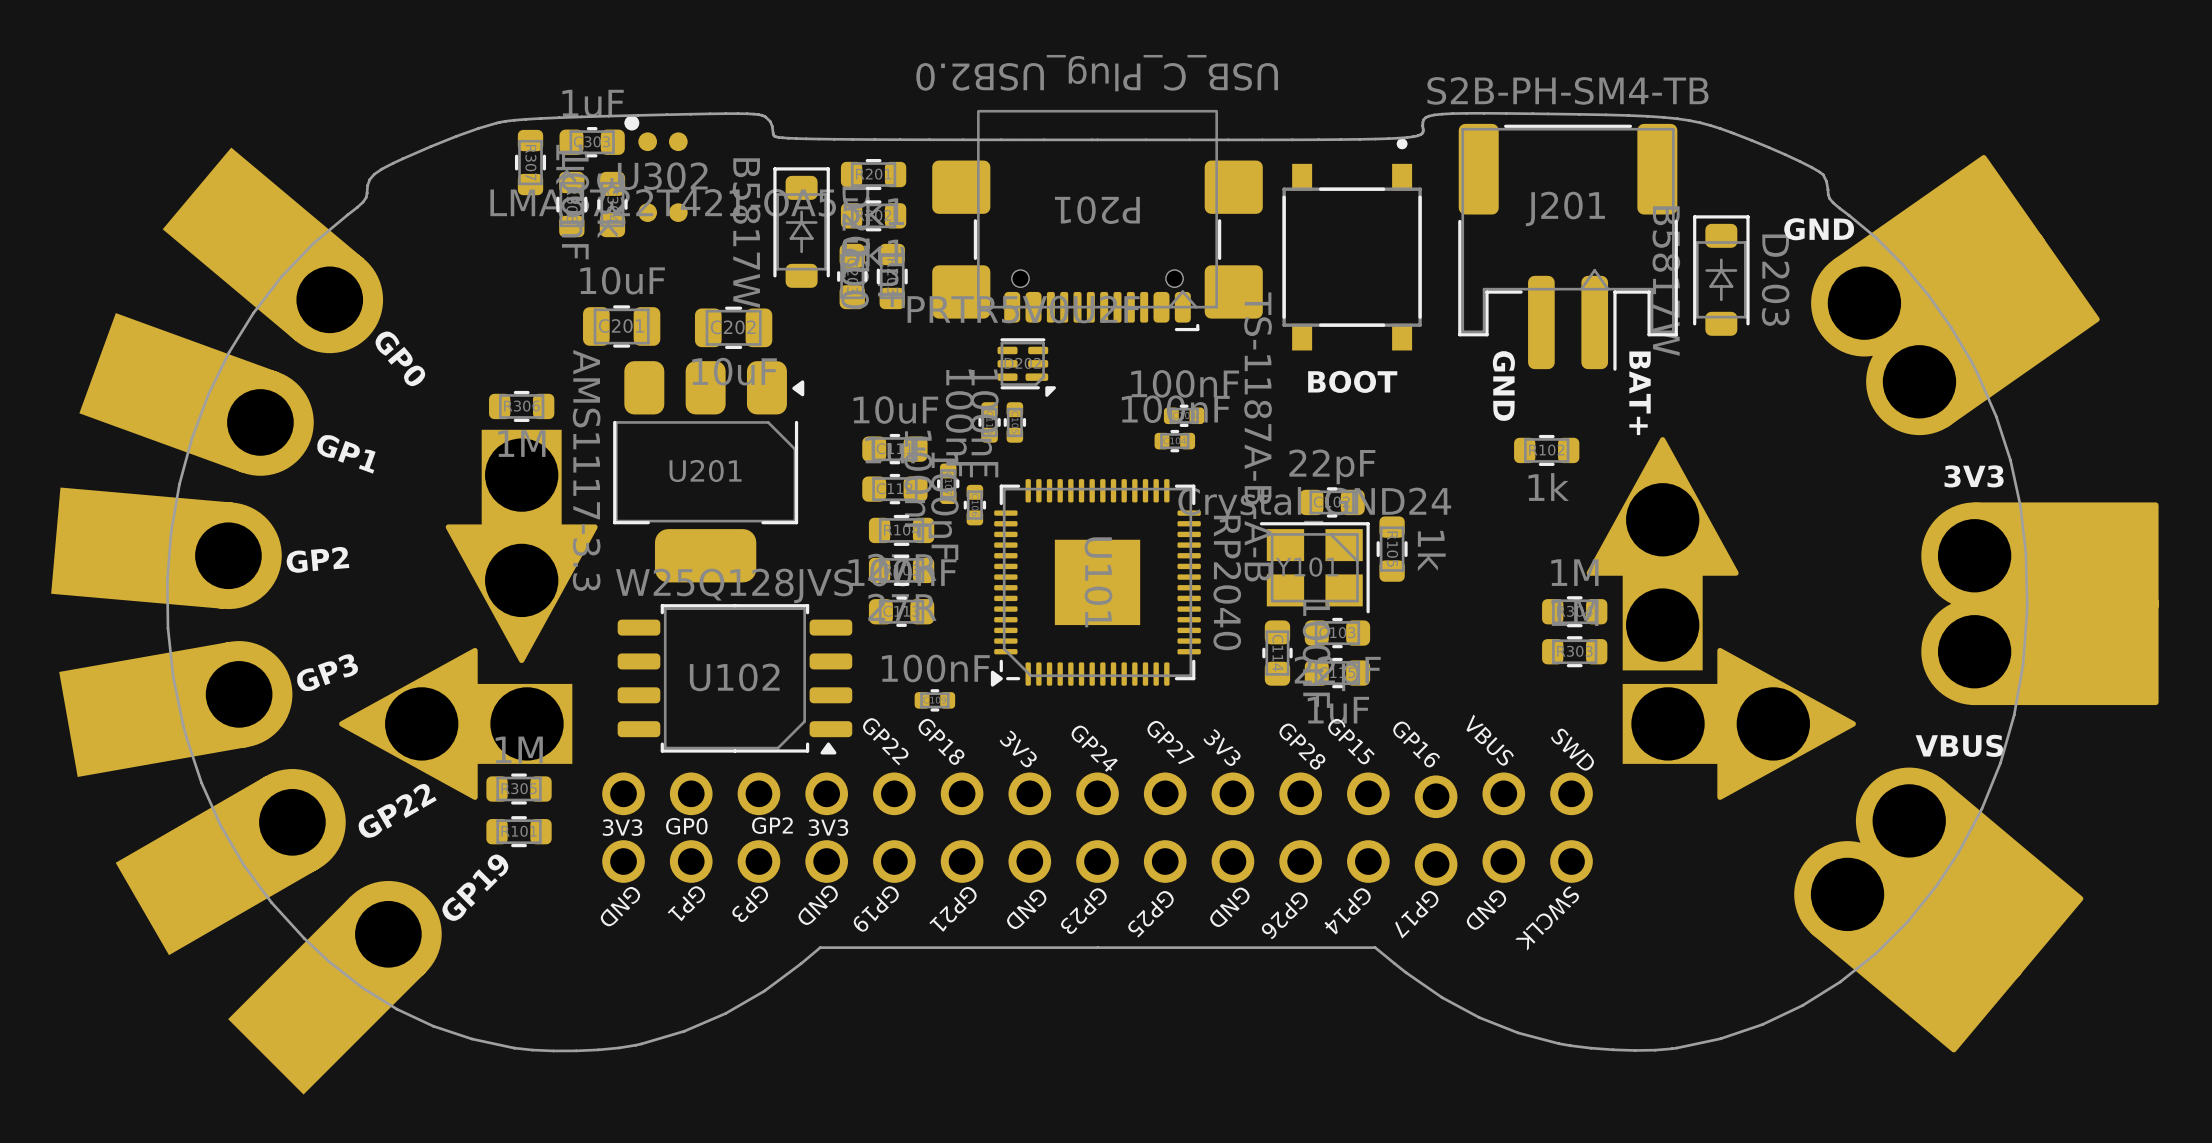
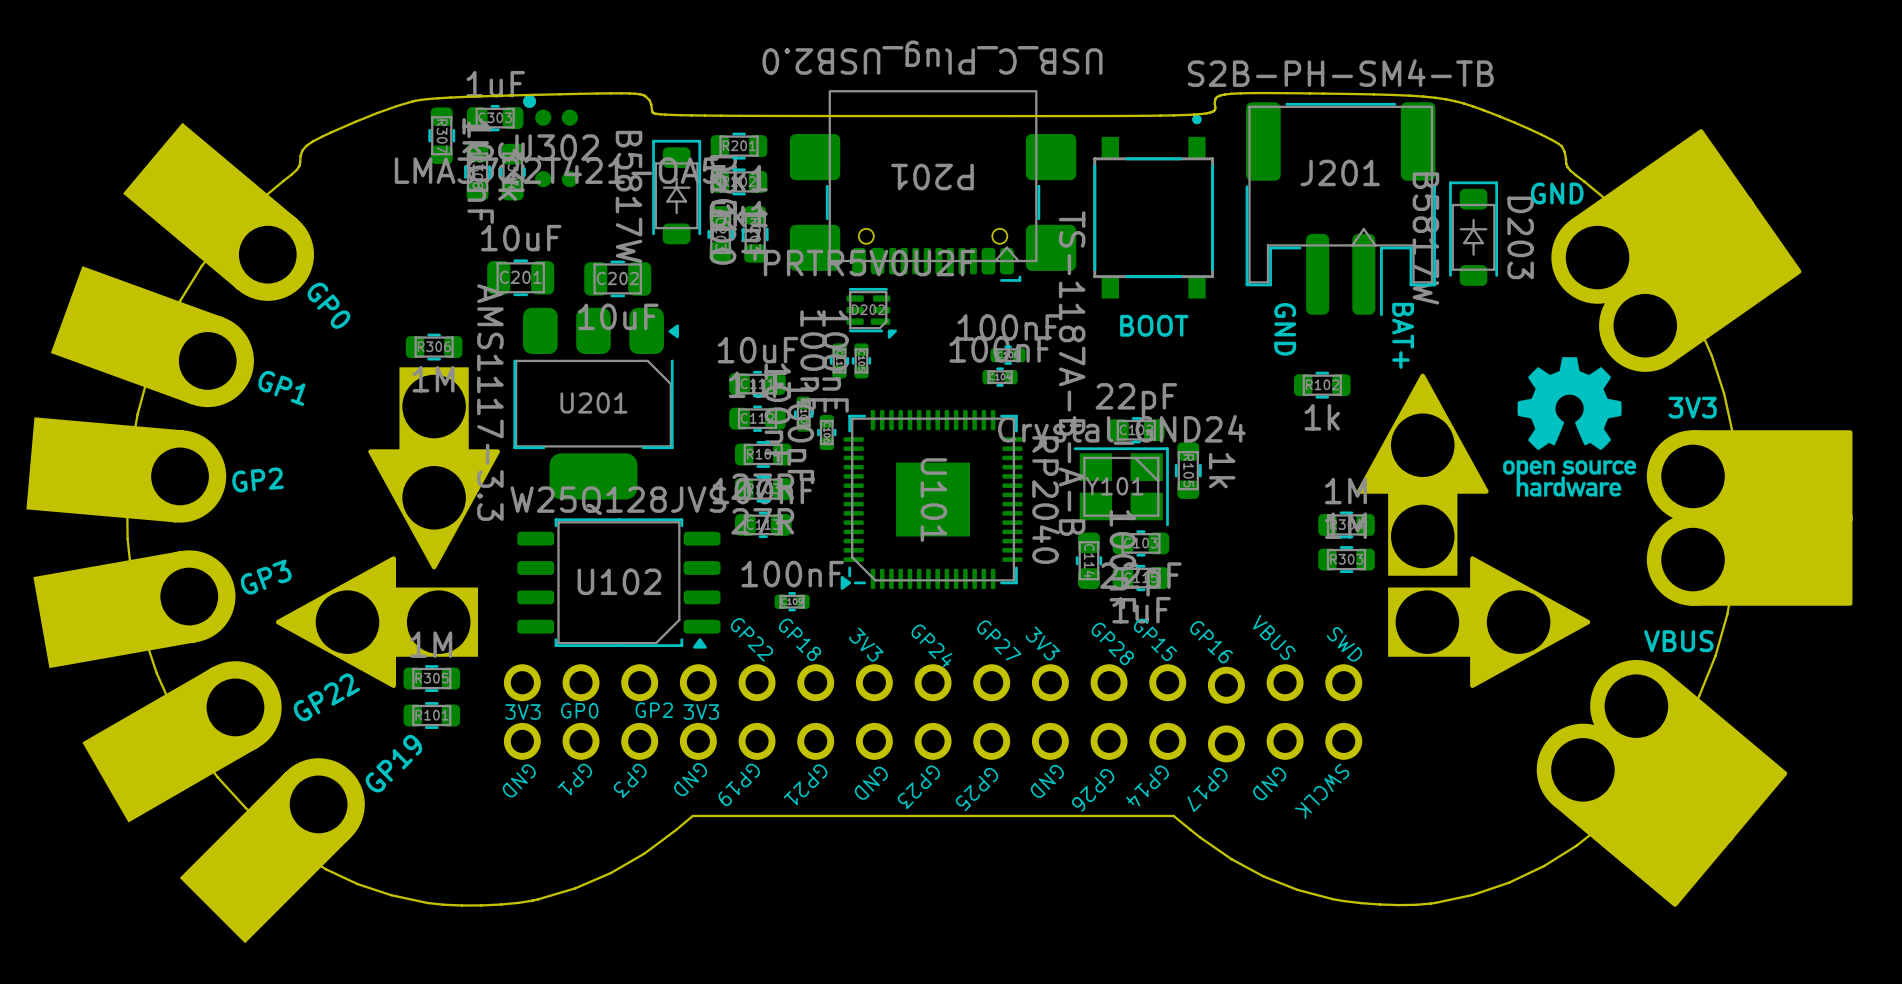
drawing: none -> [1503, 357, 1637, 497]

